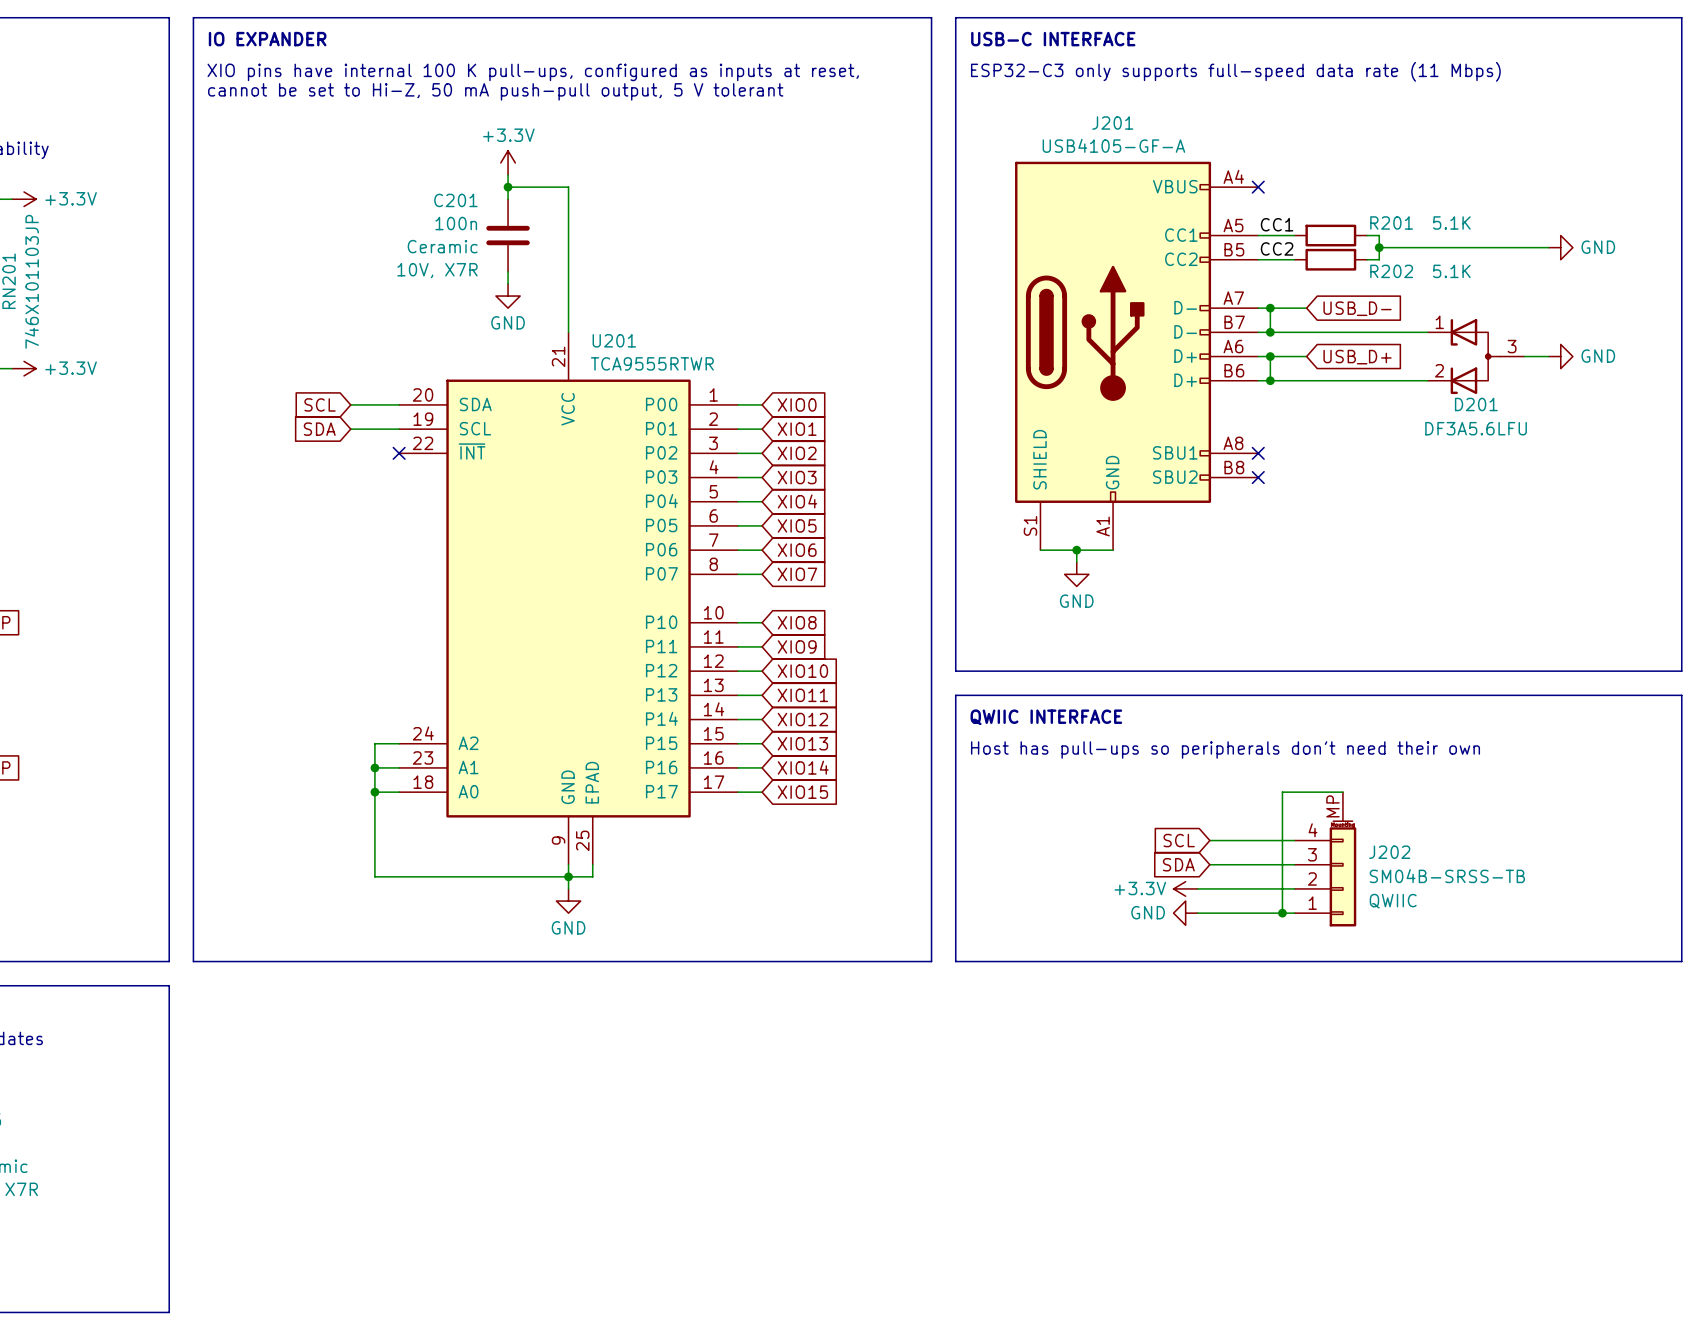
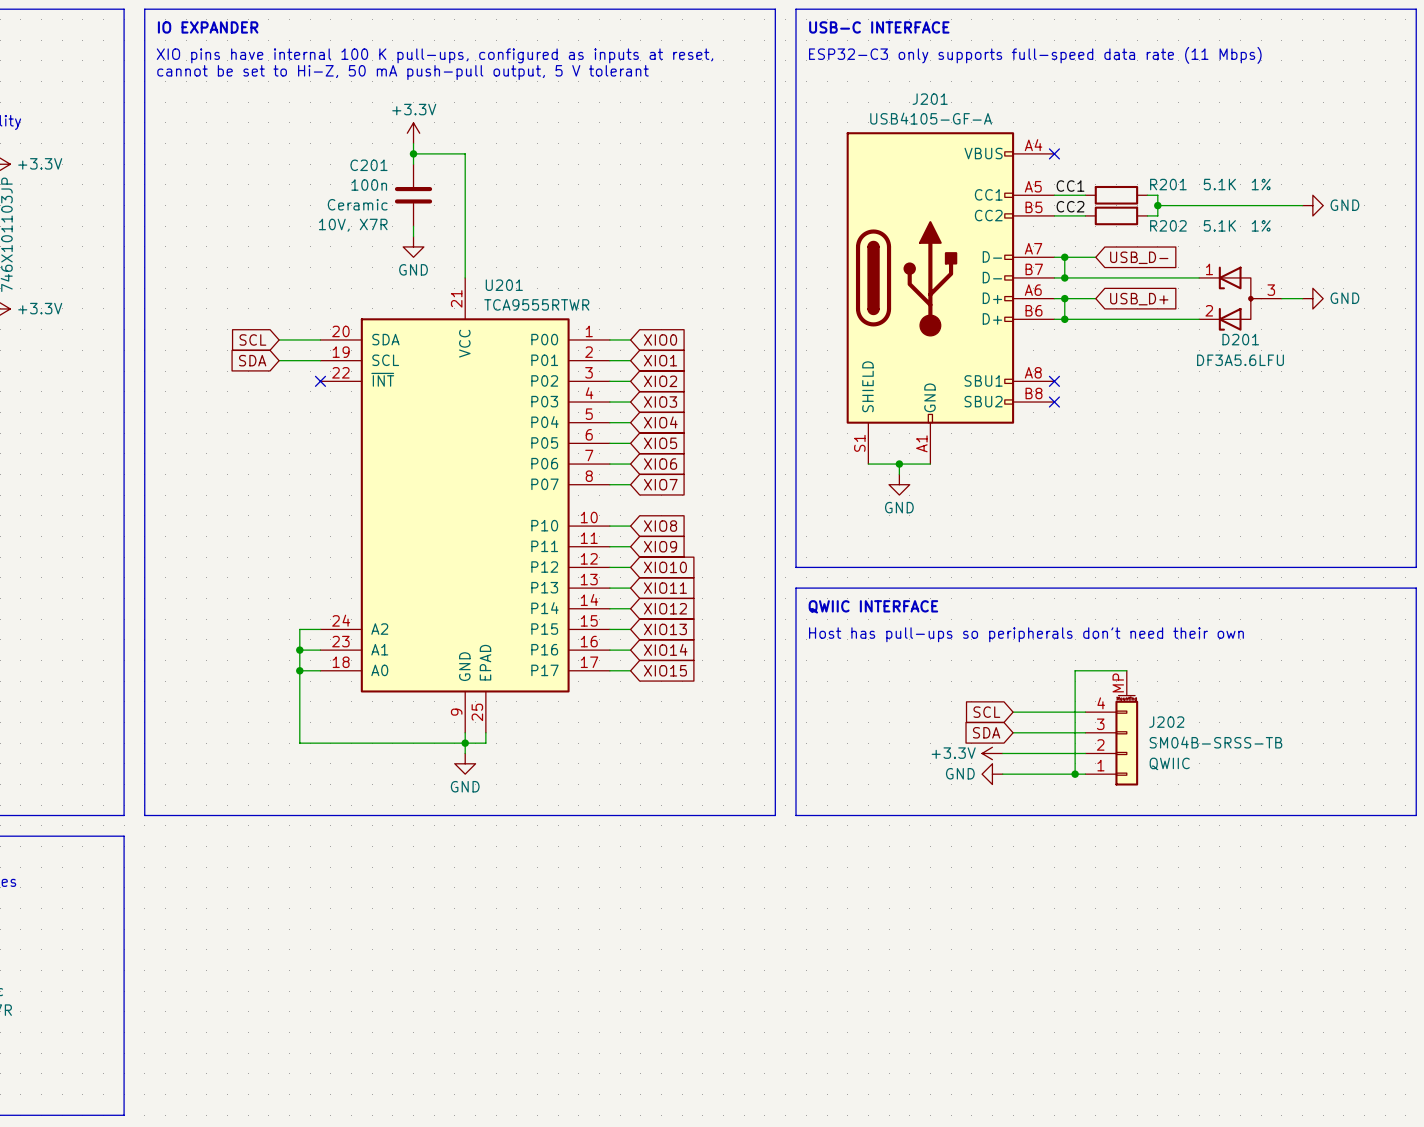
R201 text: none -> 1% (1261, 184)
R202 text: none -> 1% (1261, 225)

